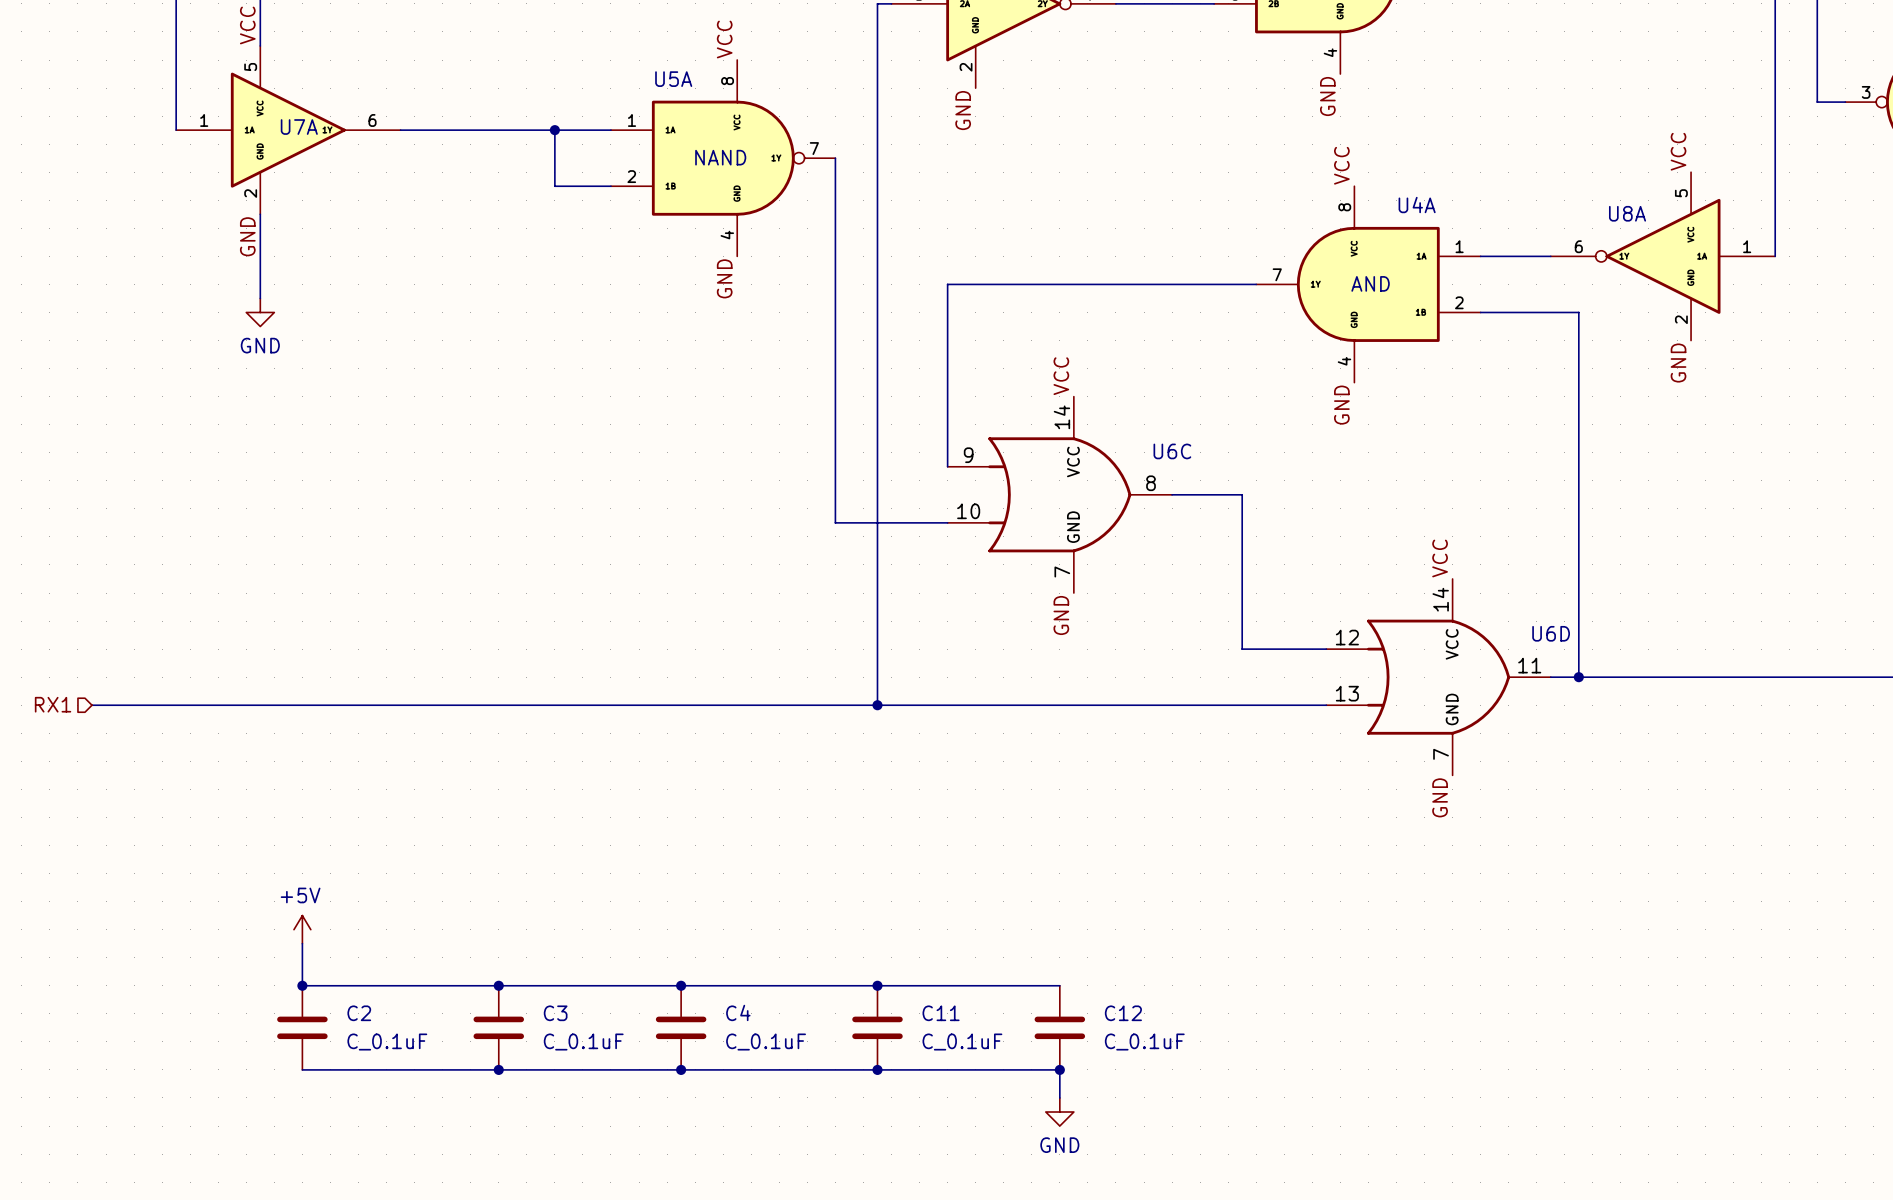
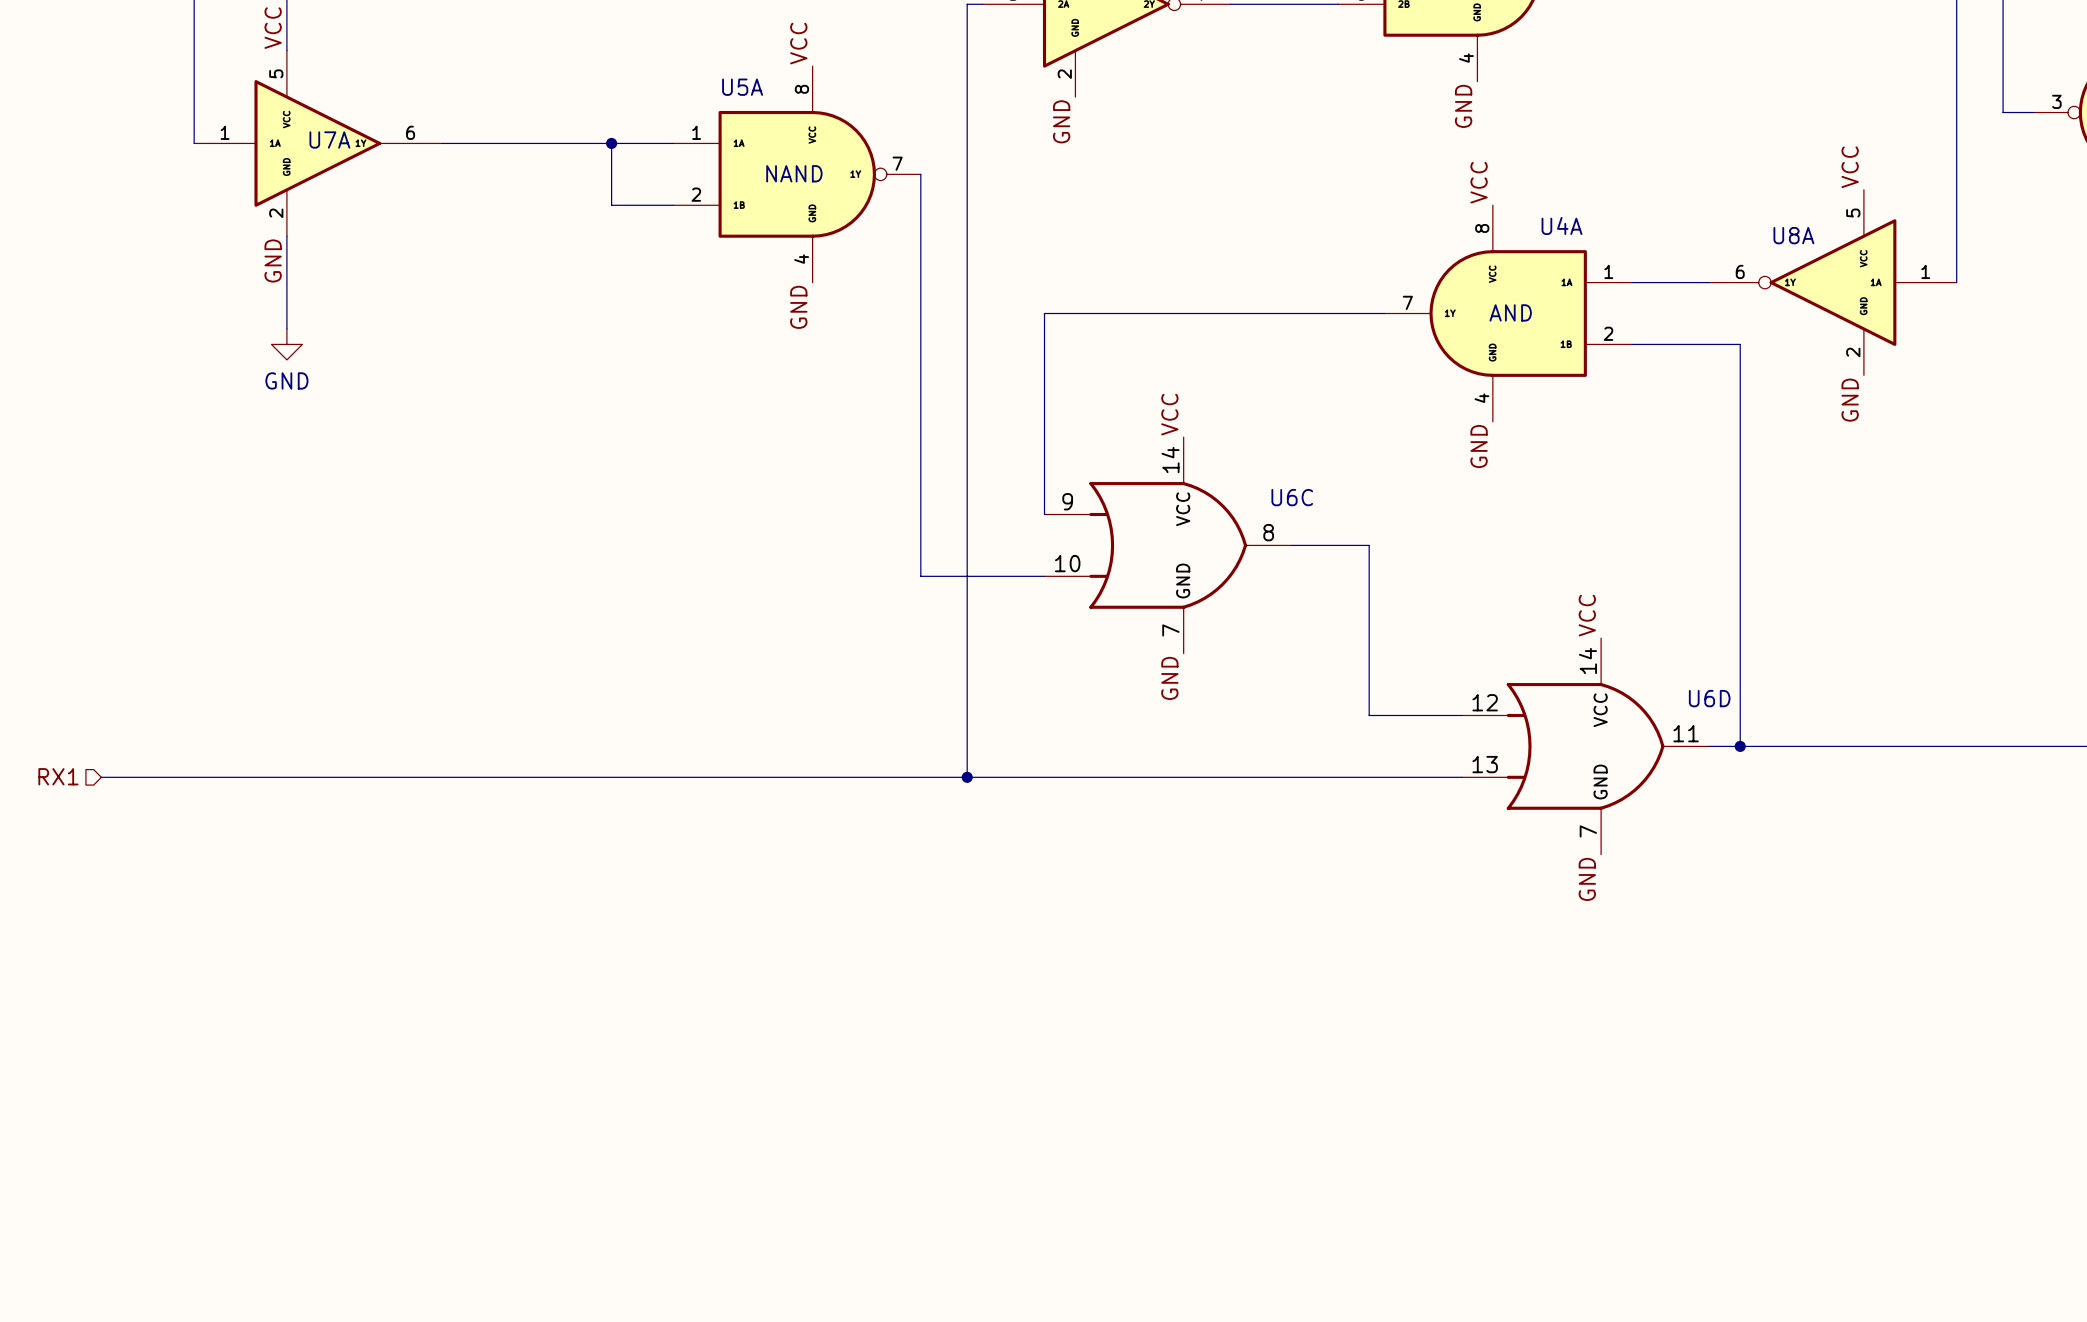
power symbol: +5V (302, 929) -> none
wire: (302, 943) (302, 985) (1059, 985) -> none
junction: (302, 985) -> none
junction: (498, 985) -> none
junction: (681, 985) -> none
junction: (877, 985) -> none
C2: C_0.1uF (302, 1027) -> none
C3: C_0.1uF (498, 1027) -> none
C4: C_0.1uF (681, 1027) -> none
C11: C_0.1uF (877, 1027) -> none
C12: C_0.1uF (1059, 1027) -> none
wire: (302, 1069) (1059, 1069) (1059, 1097) -> none
junction: (498, 1069) -> none
junction: (681, 1069) -> none
junction: (877, 1069) -> none
junction: (1059, 1069) -> none
power symbol: GND (1059, 1112) -> none

